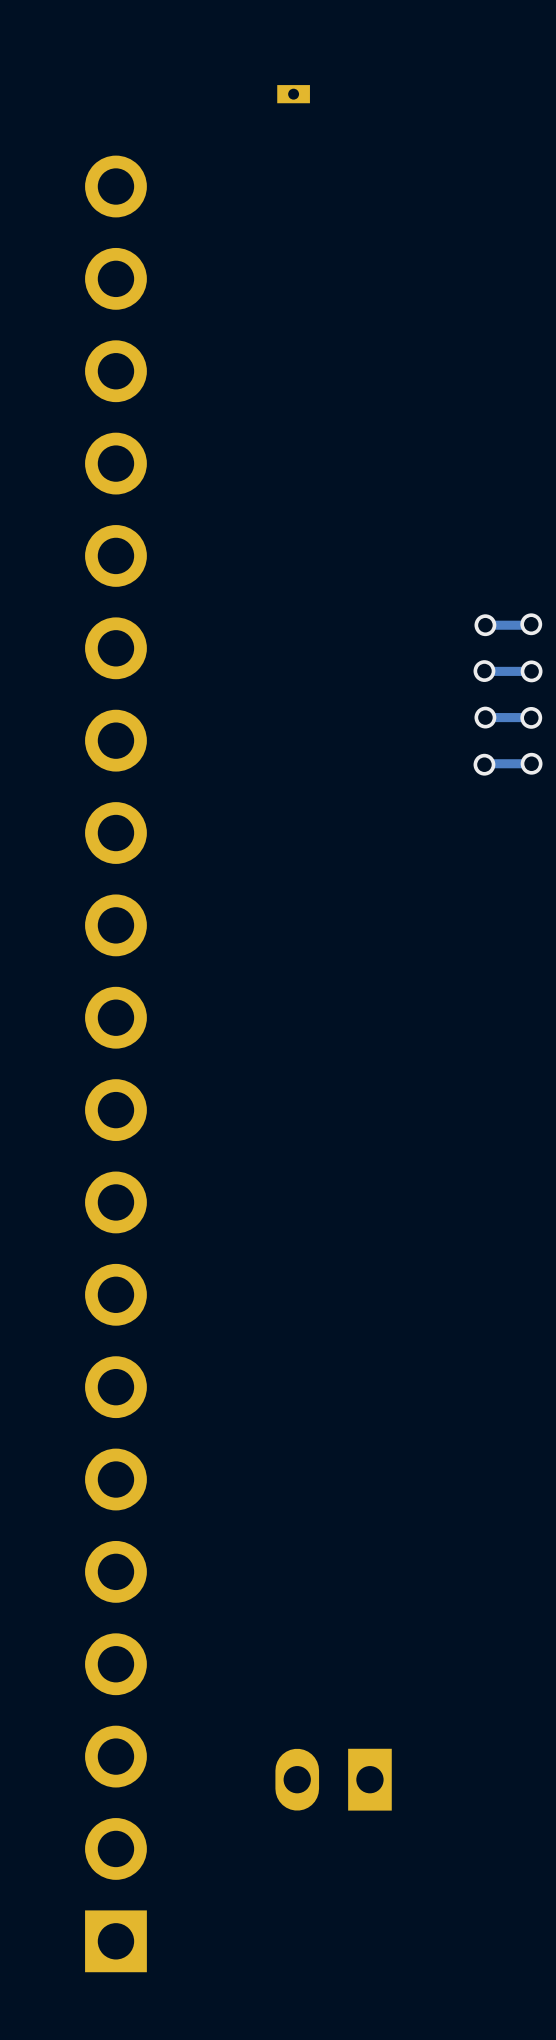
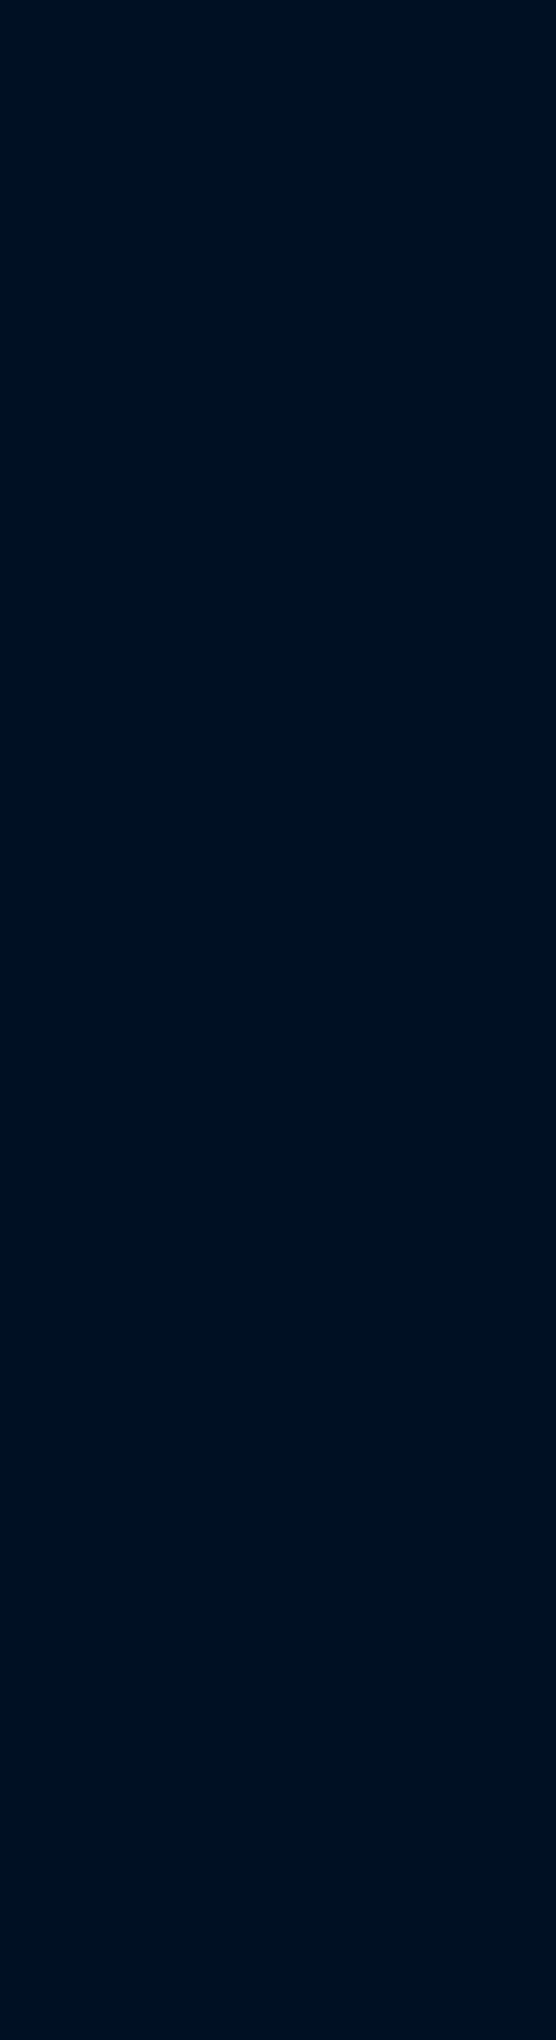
part: (293, 94) -> none
track: (531, 624) (485, 625) -> none
via: (531, 624) -> none
via: (485, 625) -> none
via: (484, 671) -> none
track: (531, 671) (484, 671) -> none
via: (531, 671) -> none
via: (485, 717) -> none
track: (530, 717) (485, 717) -> none
via: (531, 717) -> none
track: (531, 763) (484, 764) -> none
via: (531, 763) -> none
via: (484, 764) -> none
part: (115, 1063) -> none
part: (333, 1779) -> none

